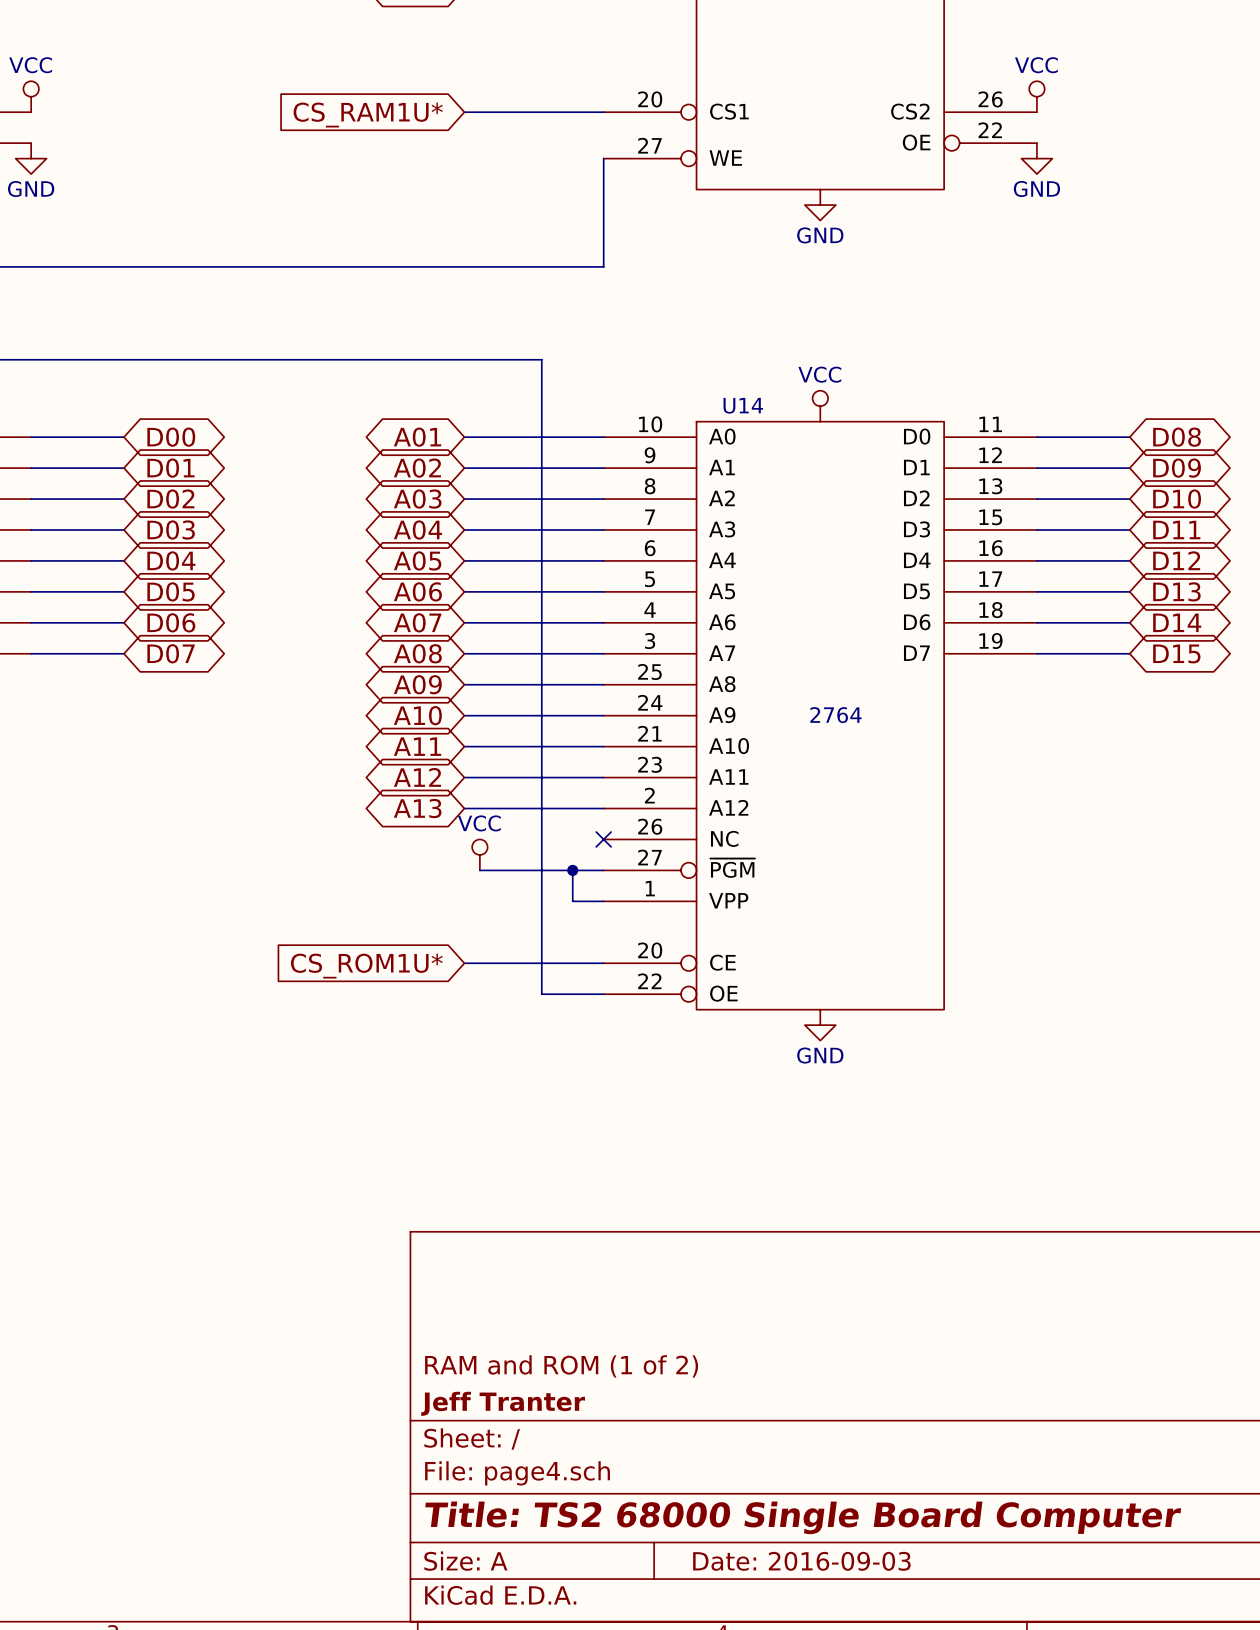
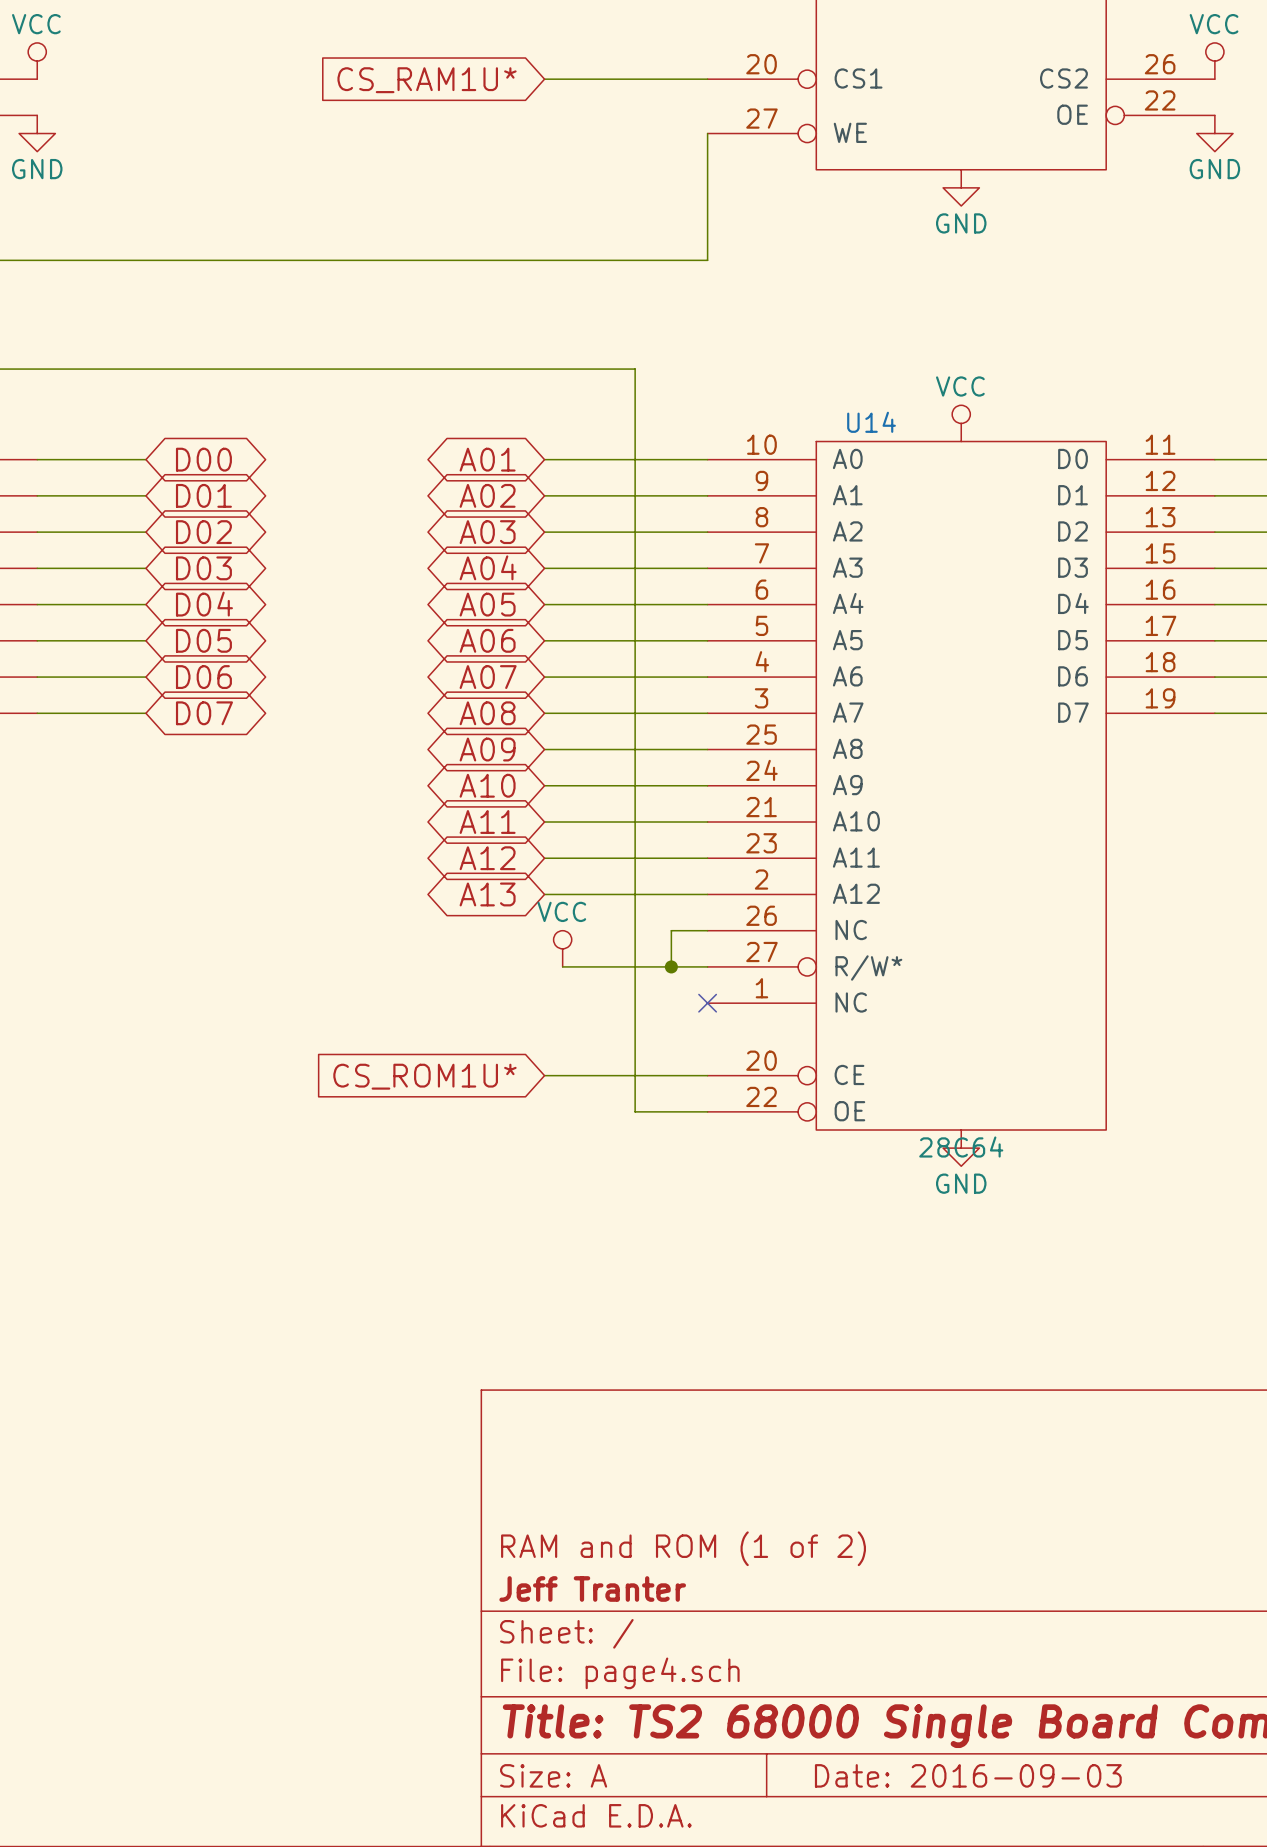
U14 value: 2764 (835, 715) -> 28C64 (961, 1147)
no-connect mark position: (603, 839) -> (707, 1003)
U14 pin name: ~{PGM} (732, 868) -> R/W* (868, 967)
wire: (572, 870) (572, 901) (603, 901) -> (671, 966) (671, 930) (707, 930)
U14 pin name: VPP (728, 900) -> NC (851, 1002)

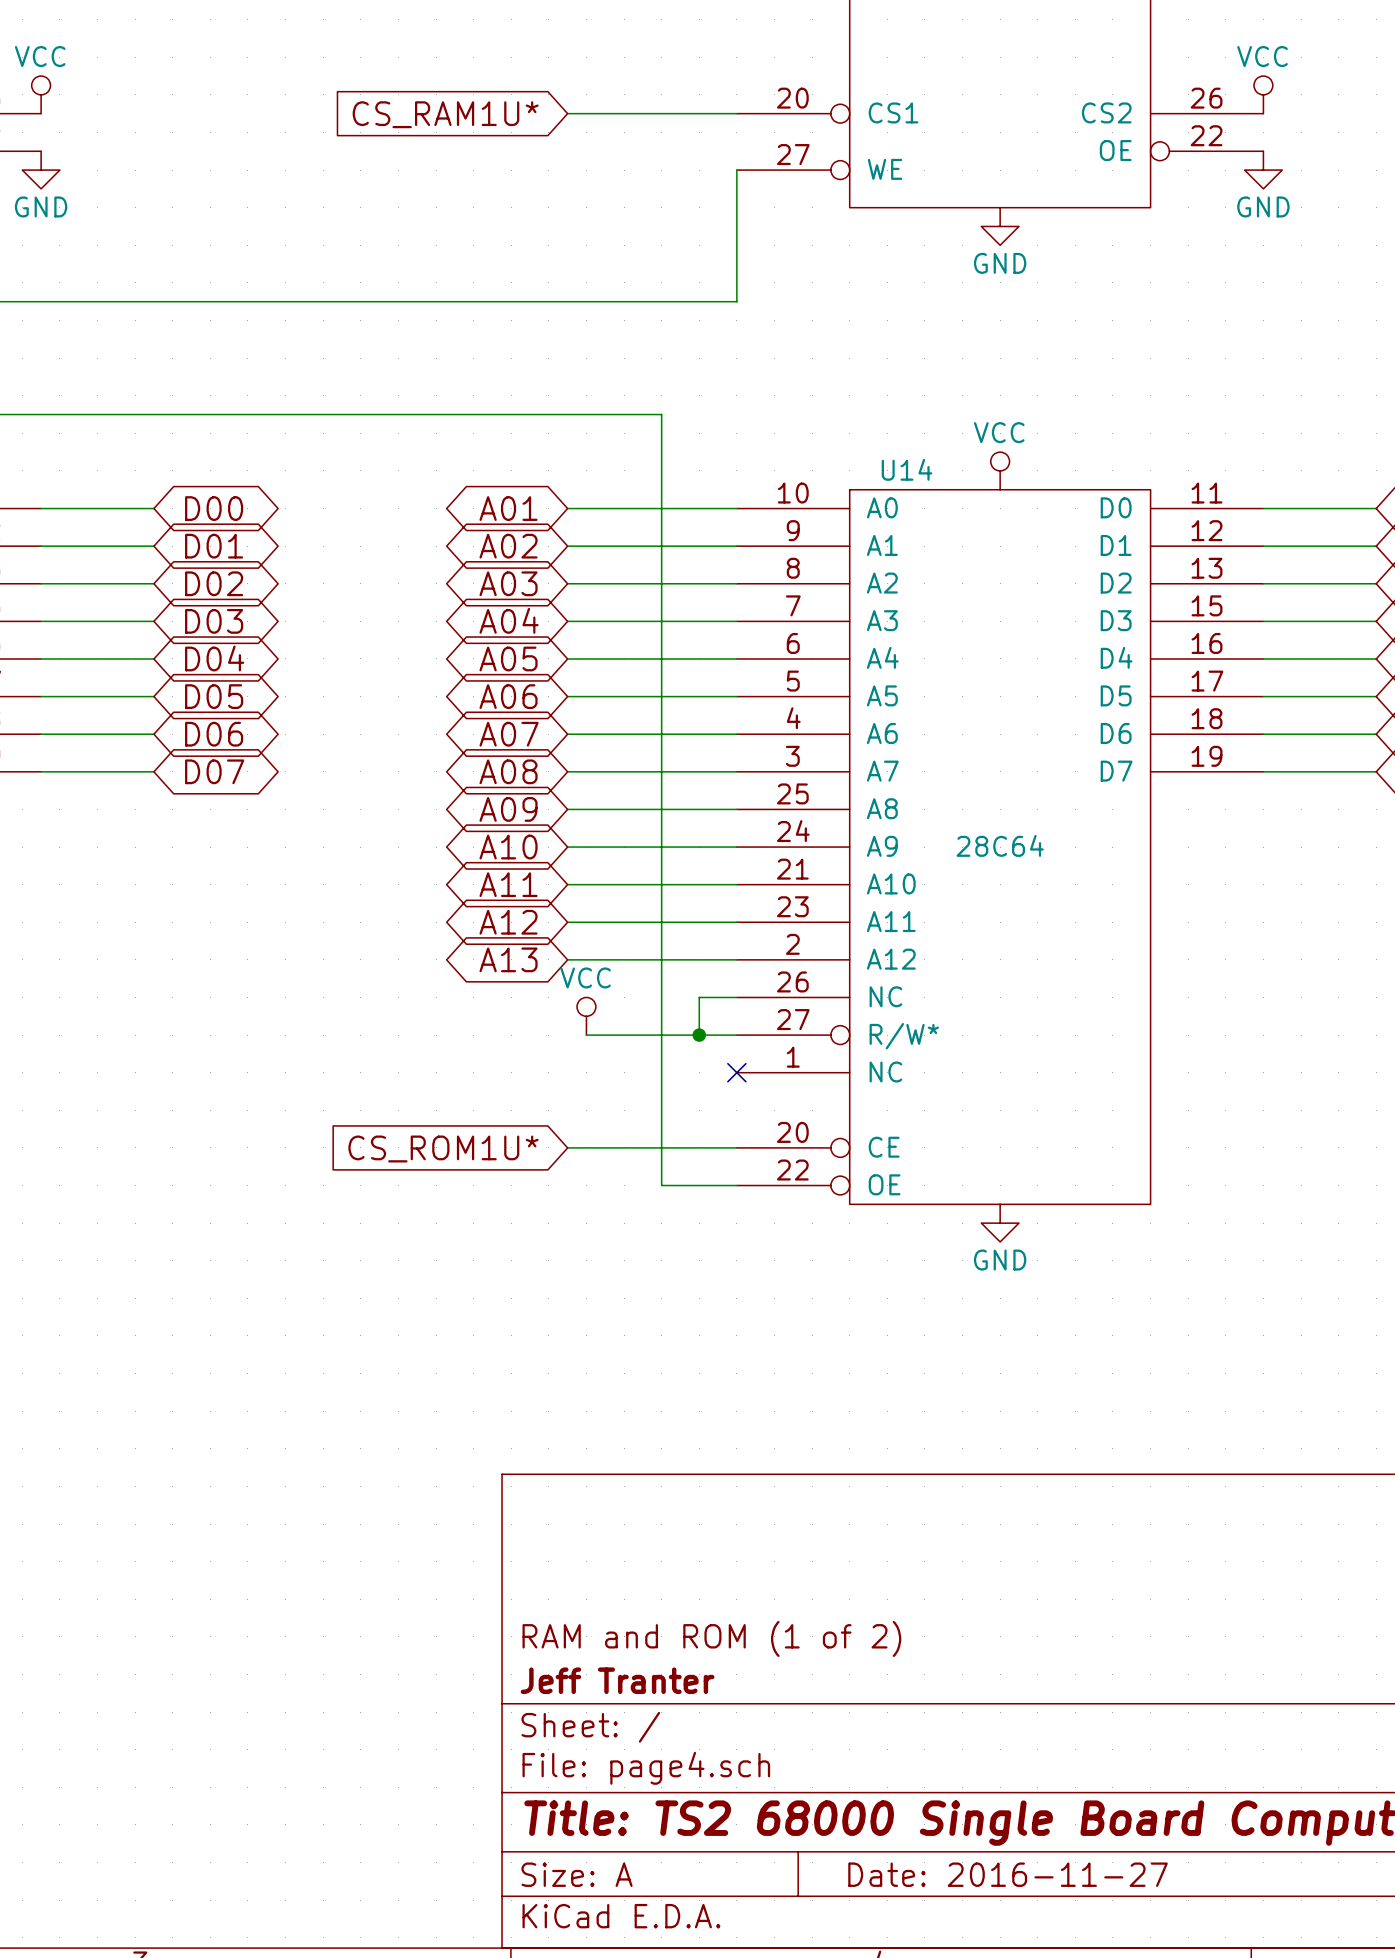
U14 value position: 28C64 (961, 1147) -> 28C64 (1000, 845)
title block: Date: 2016-09-03 (968, 1775) -> Date: 2016-11-27 (1008, 1874)

